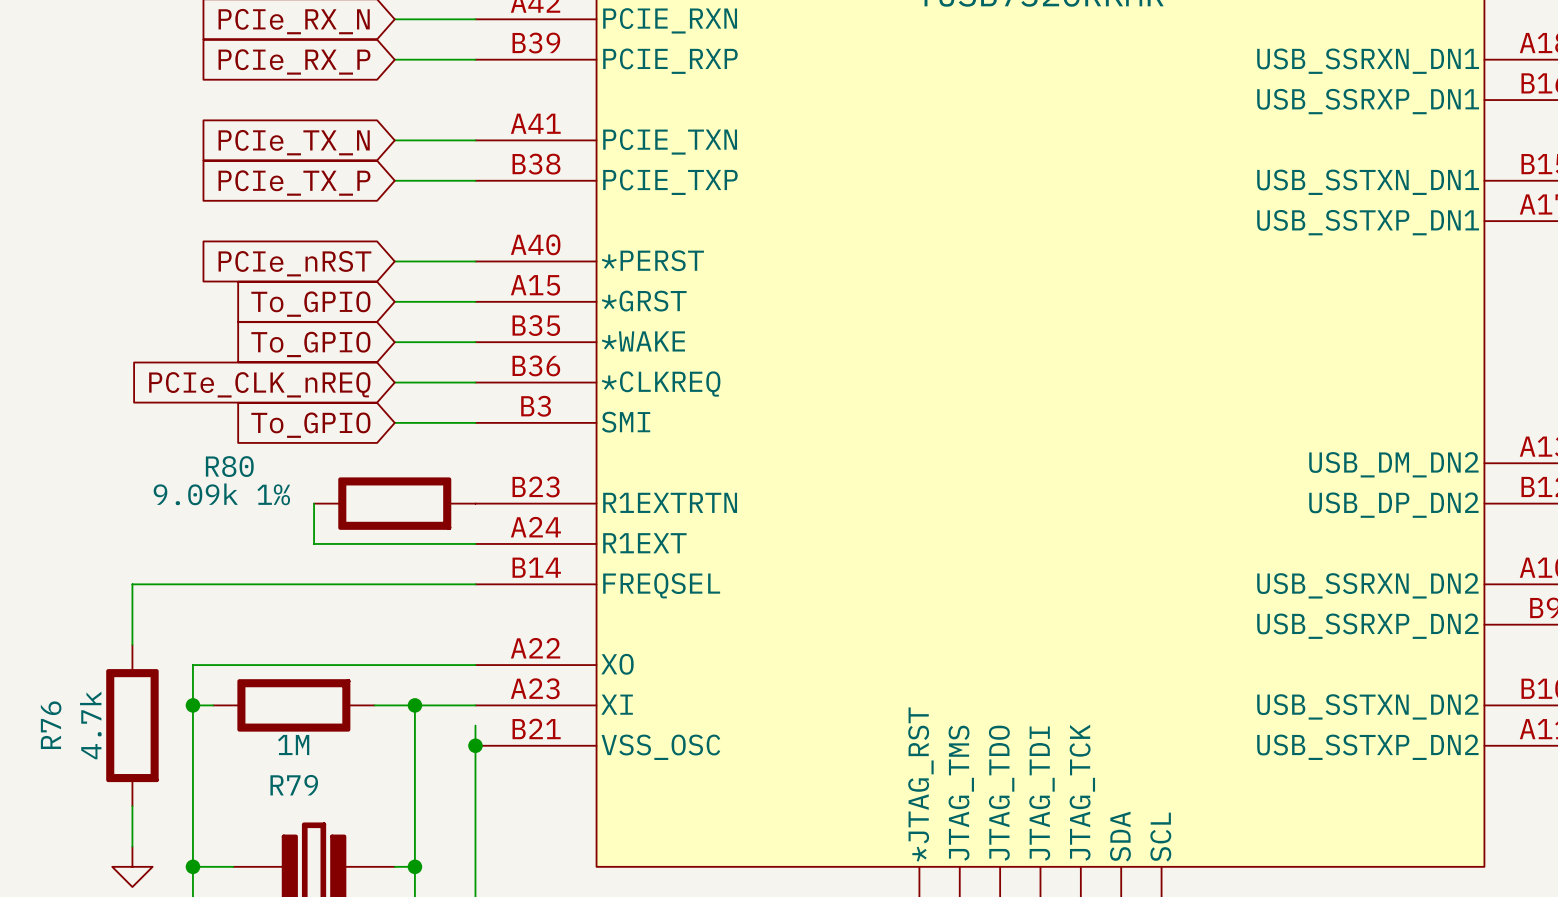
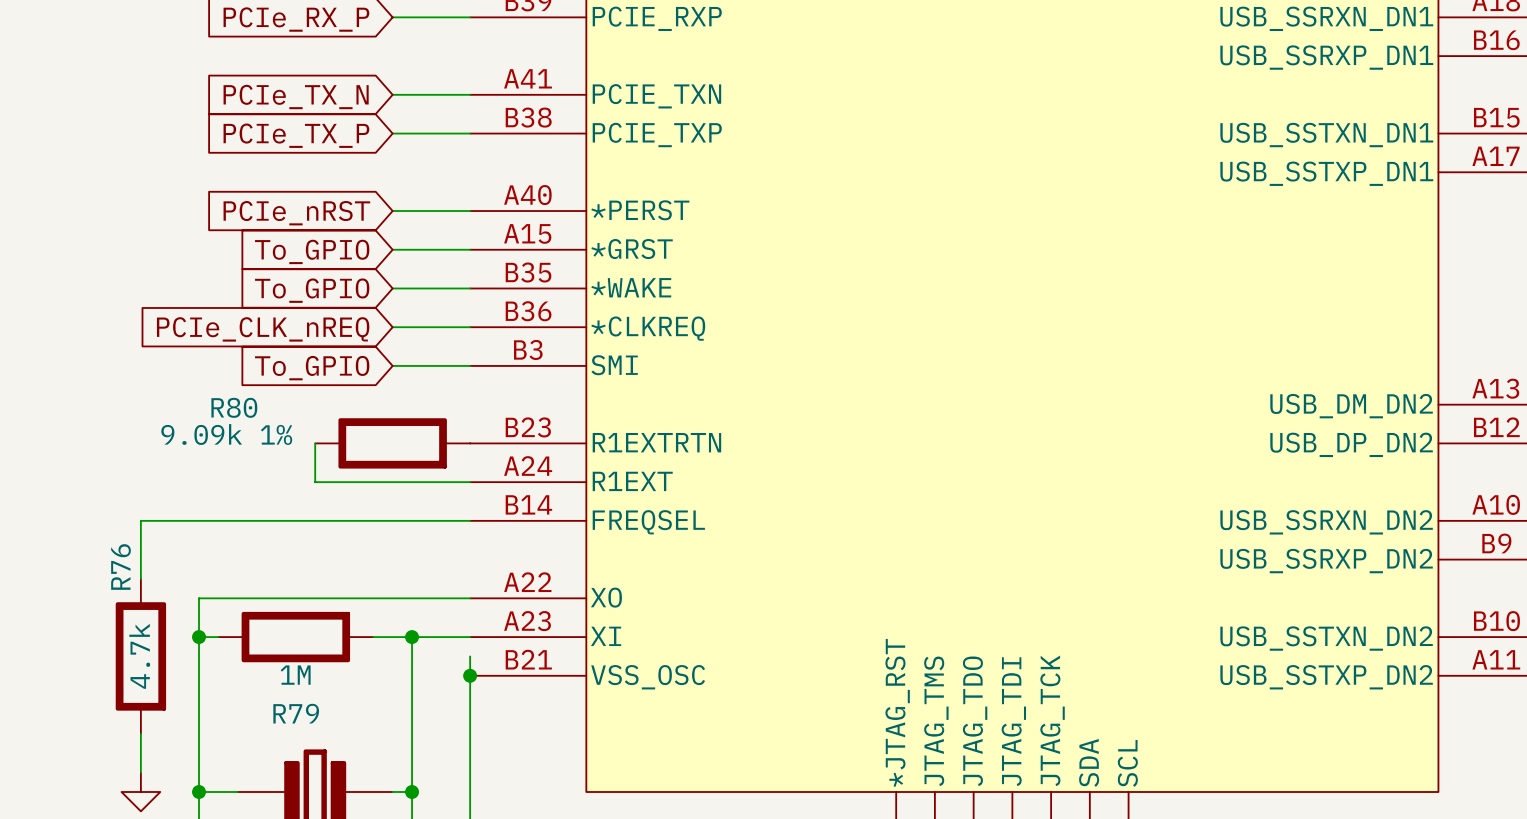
R76 name position: R76 (51, 725) -> R76 (120, 566)
R76 value position: 4.7k (90, 725) -> 4.7k (139, 656)

